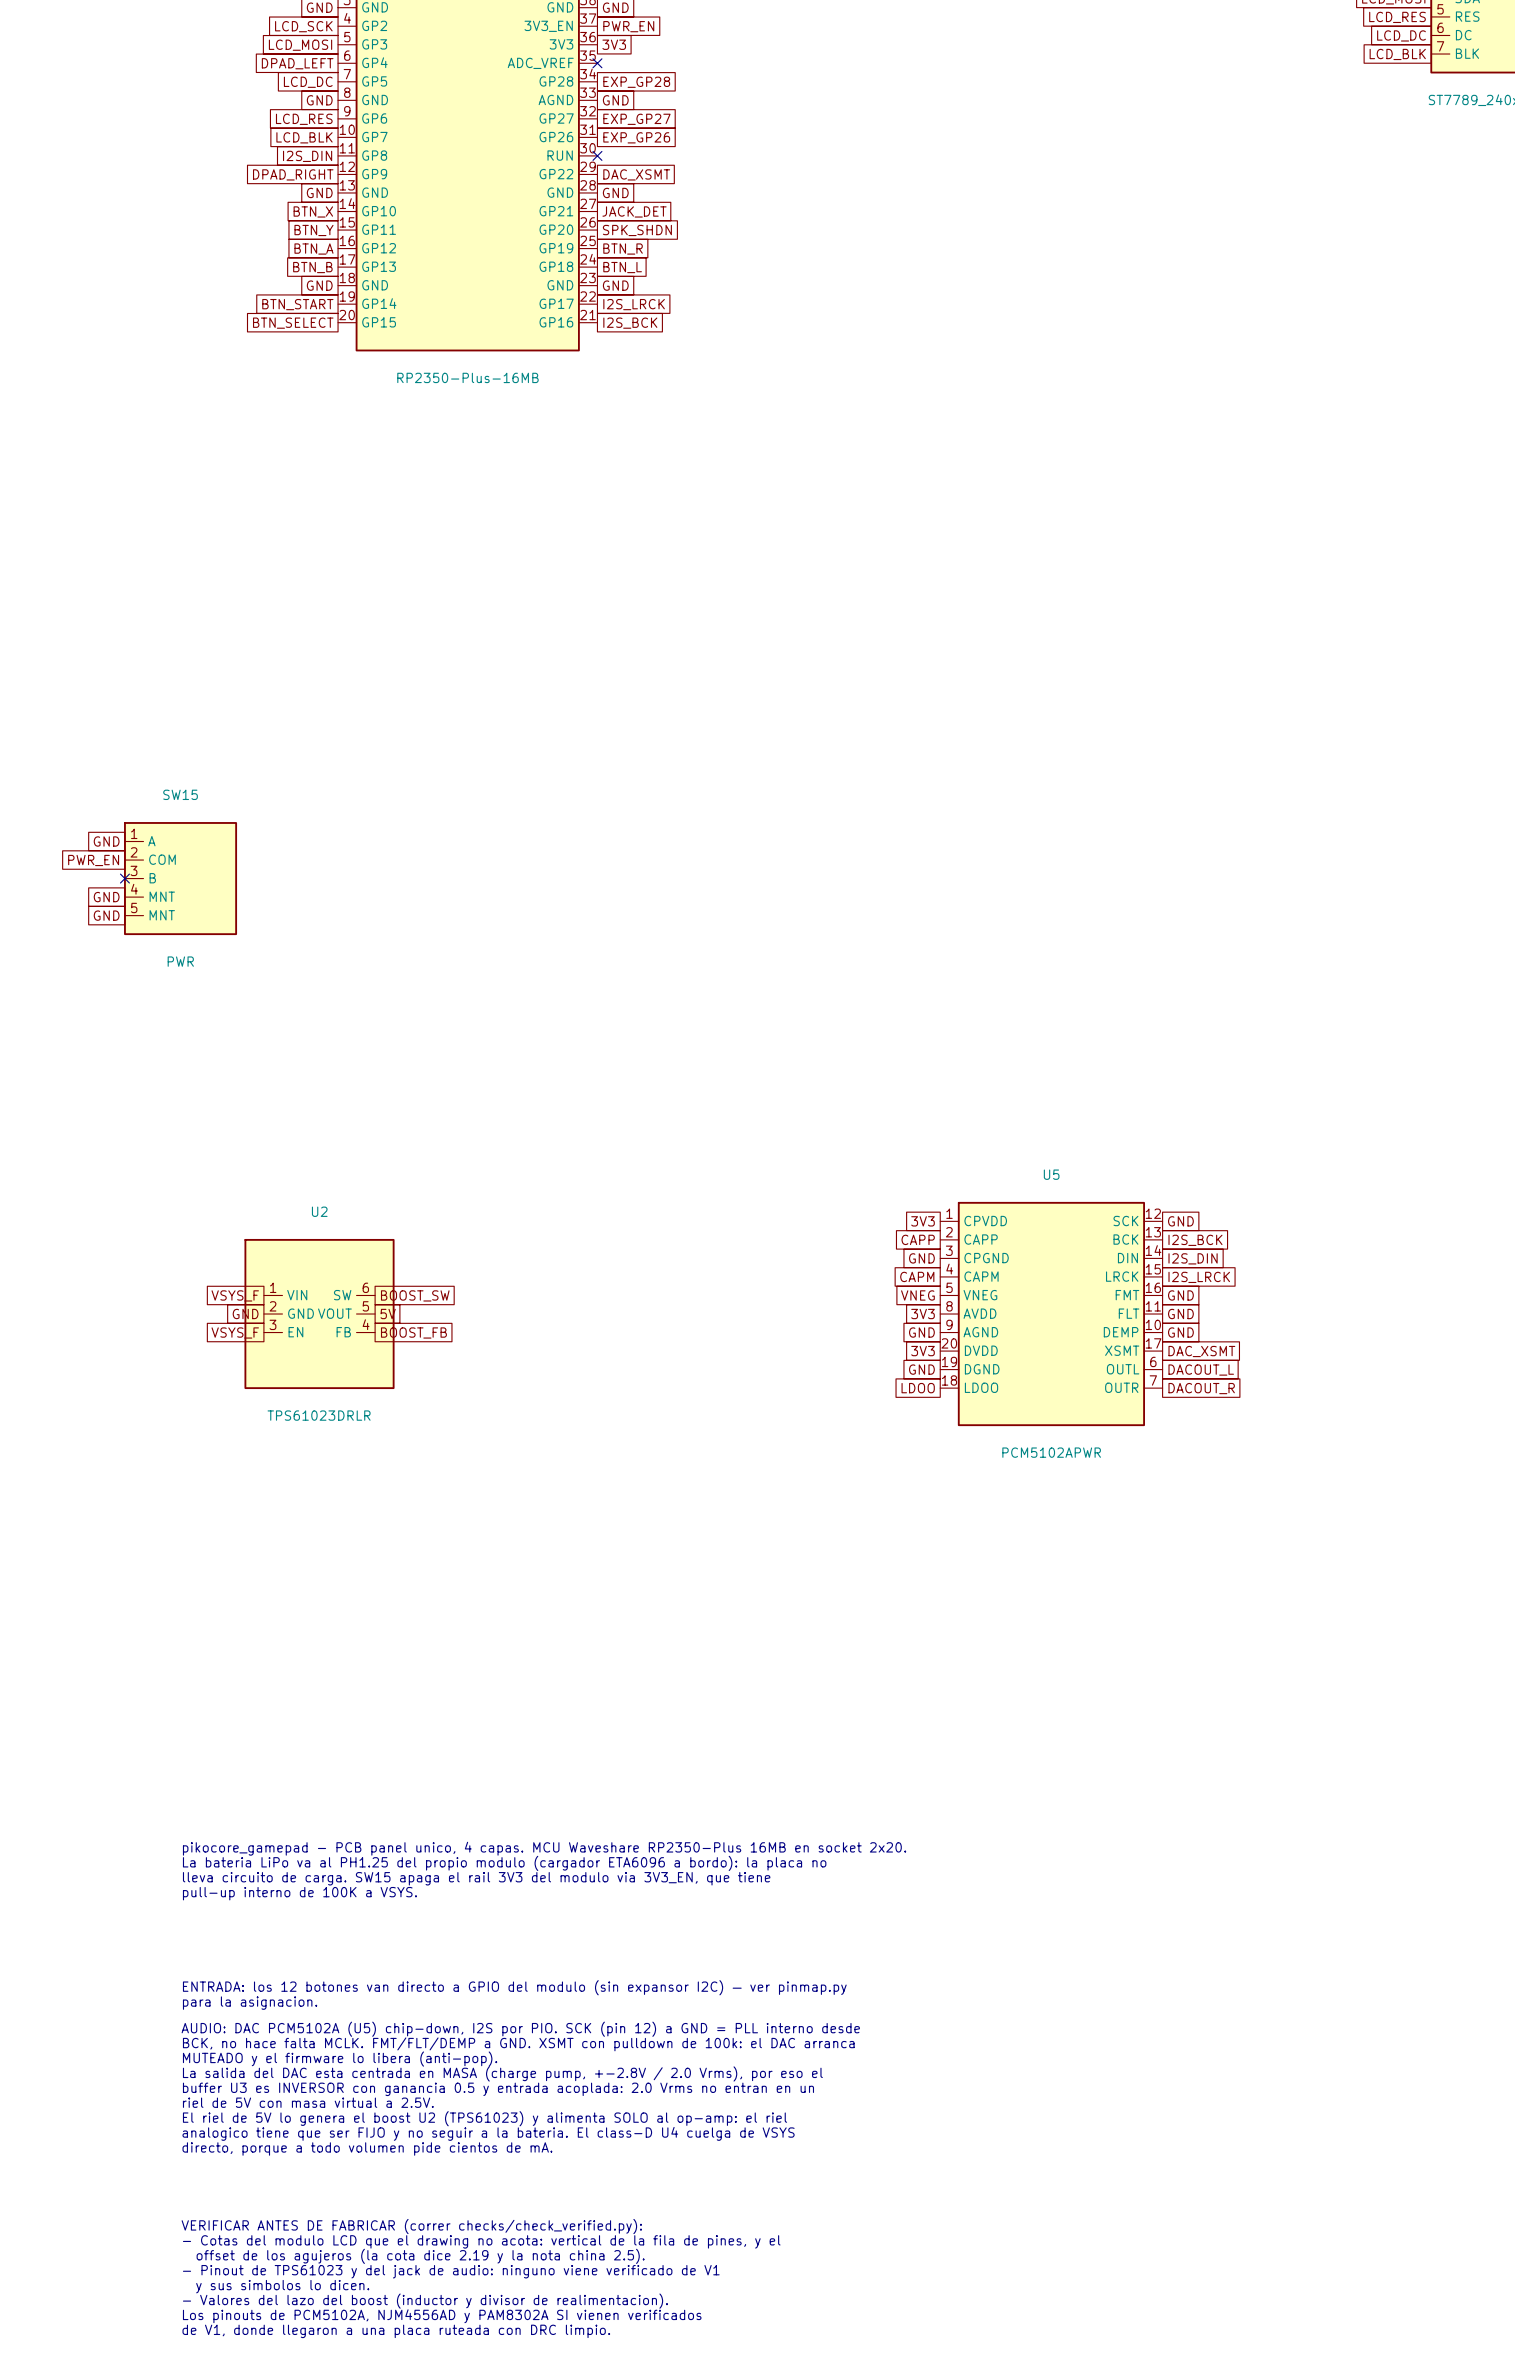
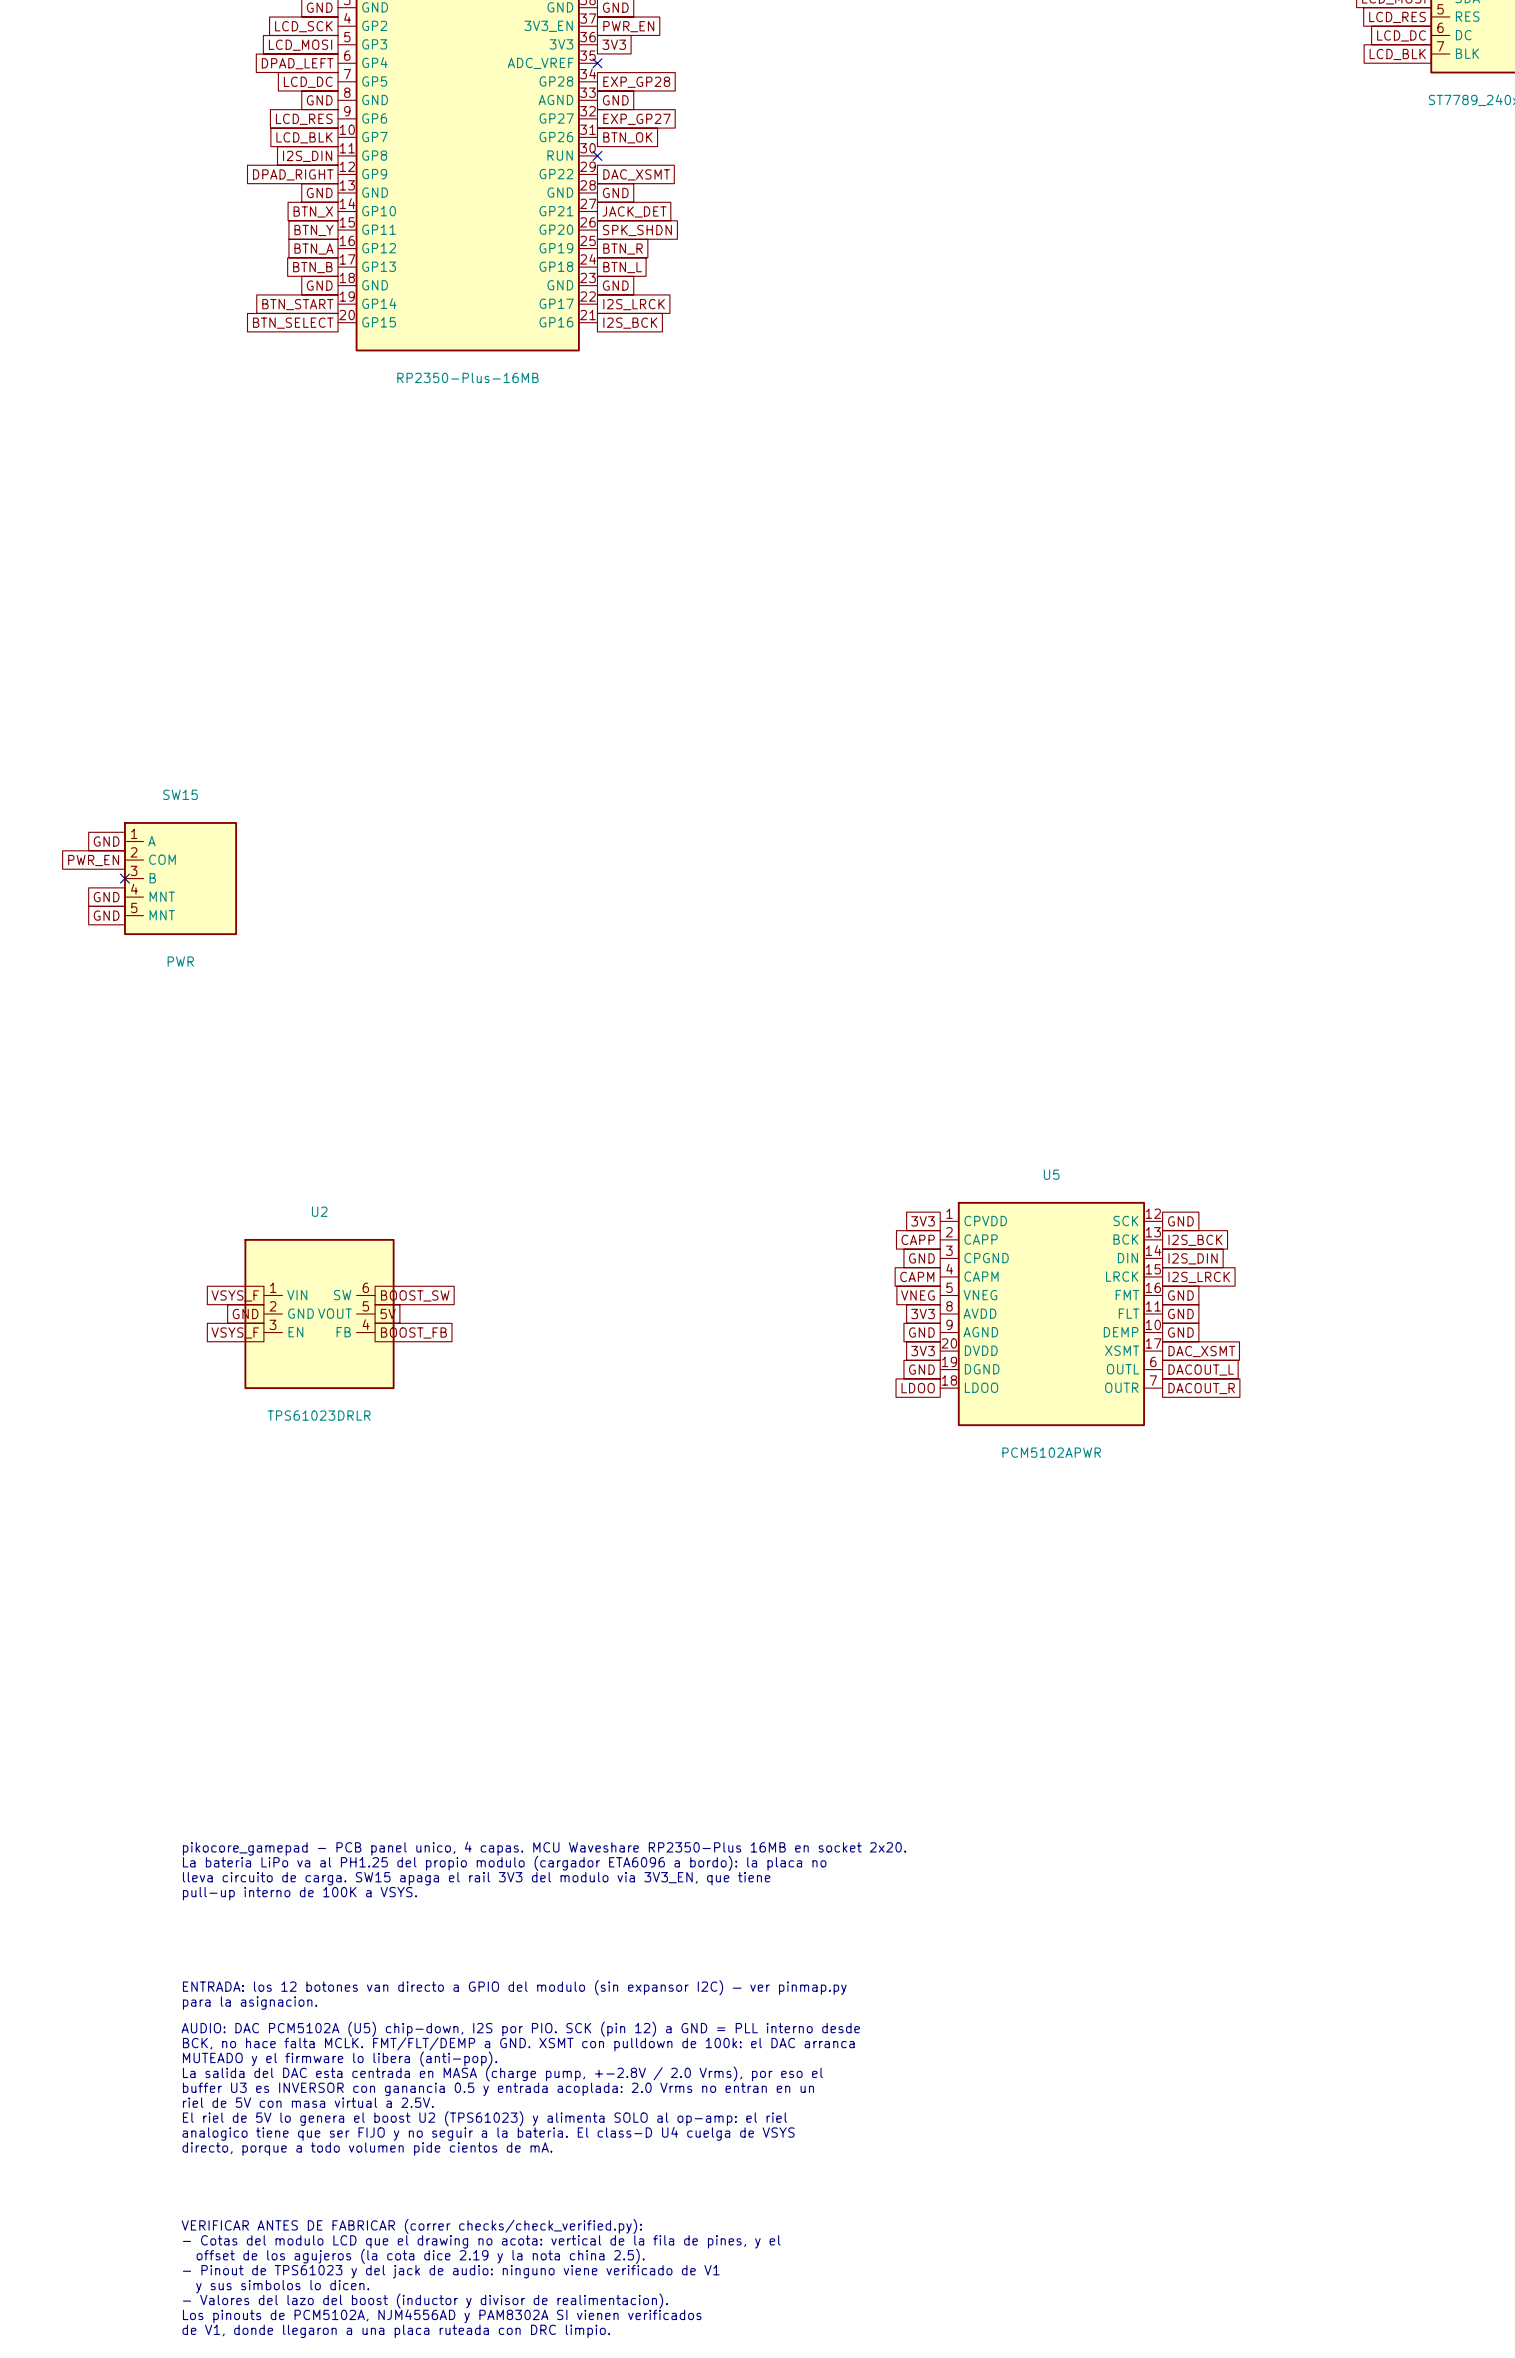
global label: EXP_GP26 (636, 137) -> BTN_OK (627, 137)

